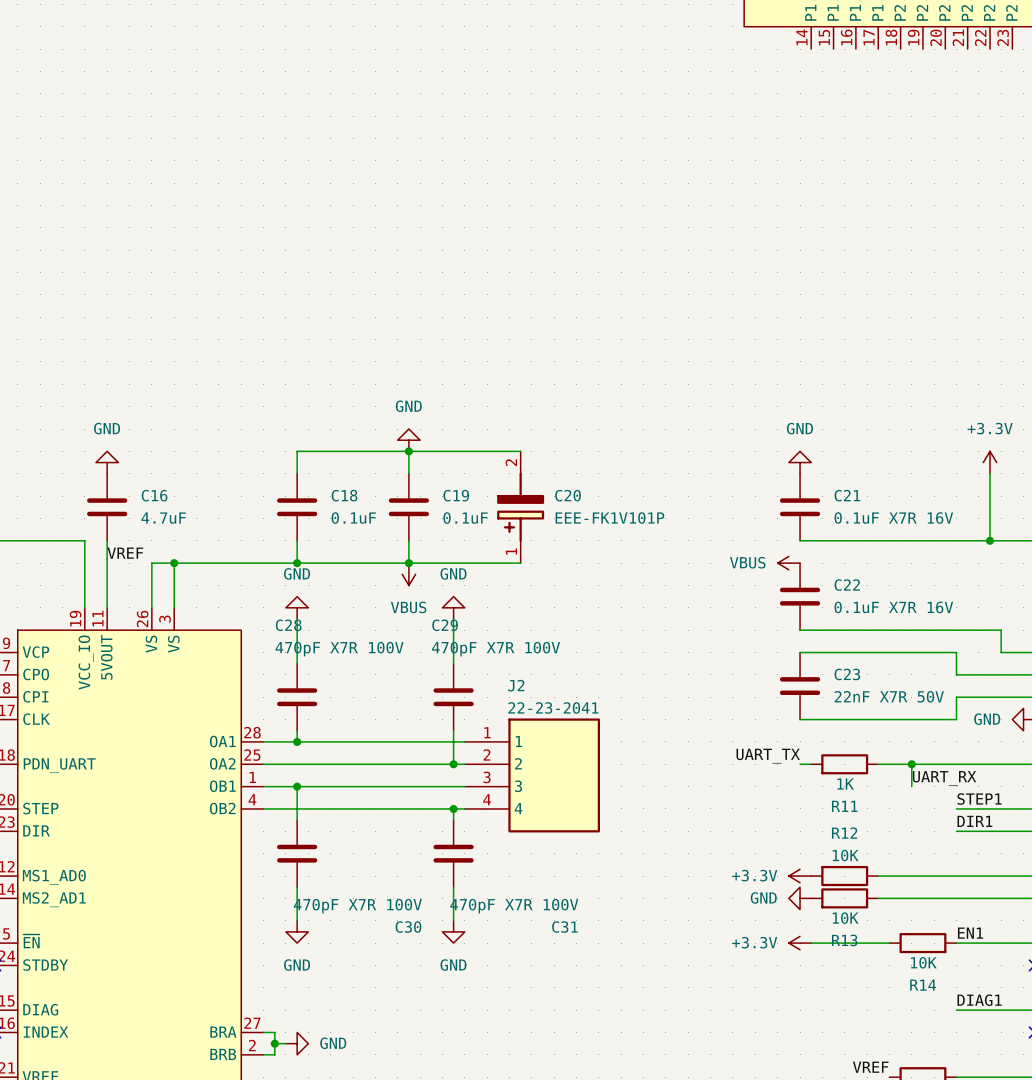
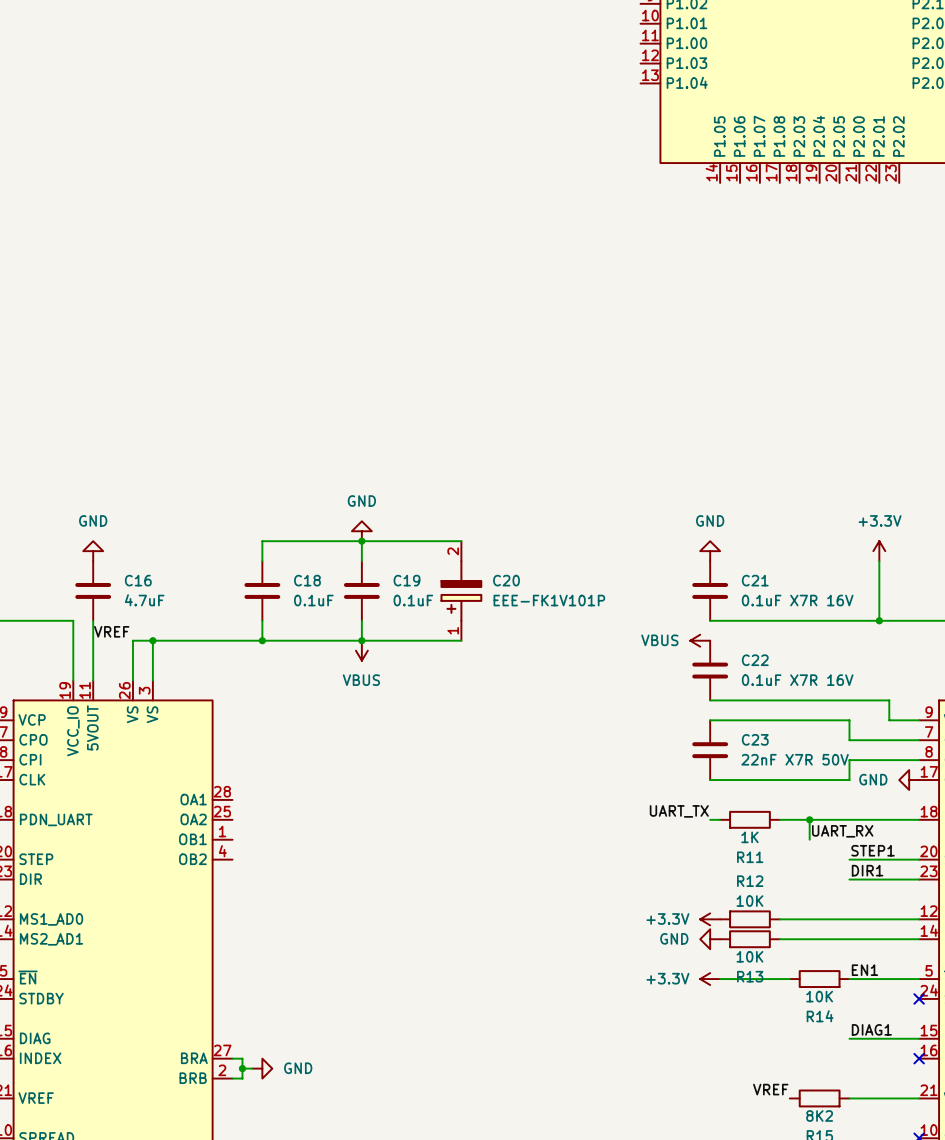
power symbol: GND (297, 607) -> none
power symbol: GND (453, 607) -> none
wire: (297, 619) (297, 663) -> none
wire: (453, 619) (453, 663) -> none
C28: 470pF X7R 100V (297, 697) -> none
C29: 470pF X7R 100V (453, 697) -> none
wire: (297, 730) (297, 741) -> none
wire: (453, 730) (453, 764) -> none
wire: (263, 741) (464, 741) -> none
junction: (297, 741) -> none
wire: (263, 764) (464, 764) -> none
junction: (453, 764) -> none
J2: 22-23-2041 (532, 775) -> none
wire: (263, 786) (464, 786) -> none
wire: (297, 786) (297, 820) -> none
junction: (297, 786) -> none
wire: (263, 808) (464, 808) -> none
wire: (453, 808) (453, 820) -> none
junction: (453, 808) -> none
C30: 470pF X7R 100V (297, 853) -> none
C31: 470pF X7R 100V (453, 853) -> none
wire: (297, 887) (297, 920) -> none
wire: (453, 887) (453, 920) -> none
power symbol: GND (297, 931) -> none
power symbol: GND (453, 931) -> none

